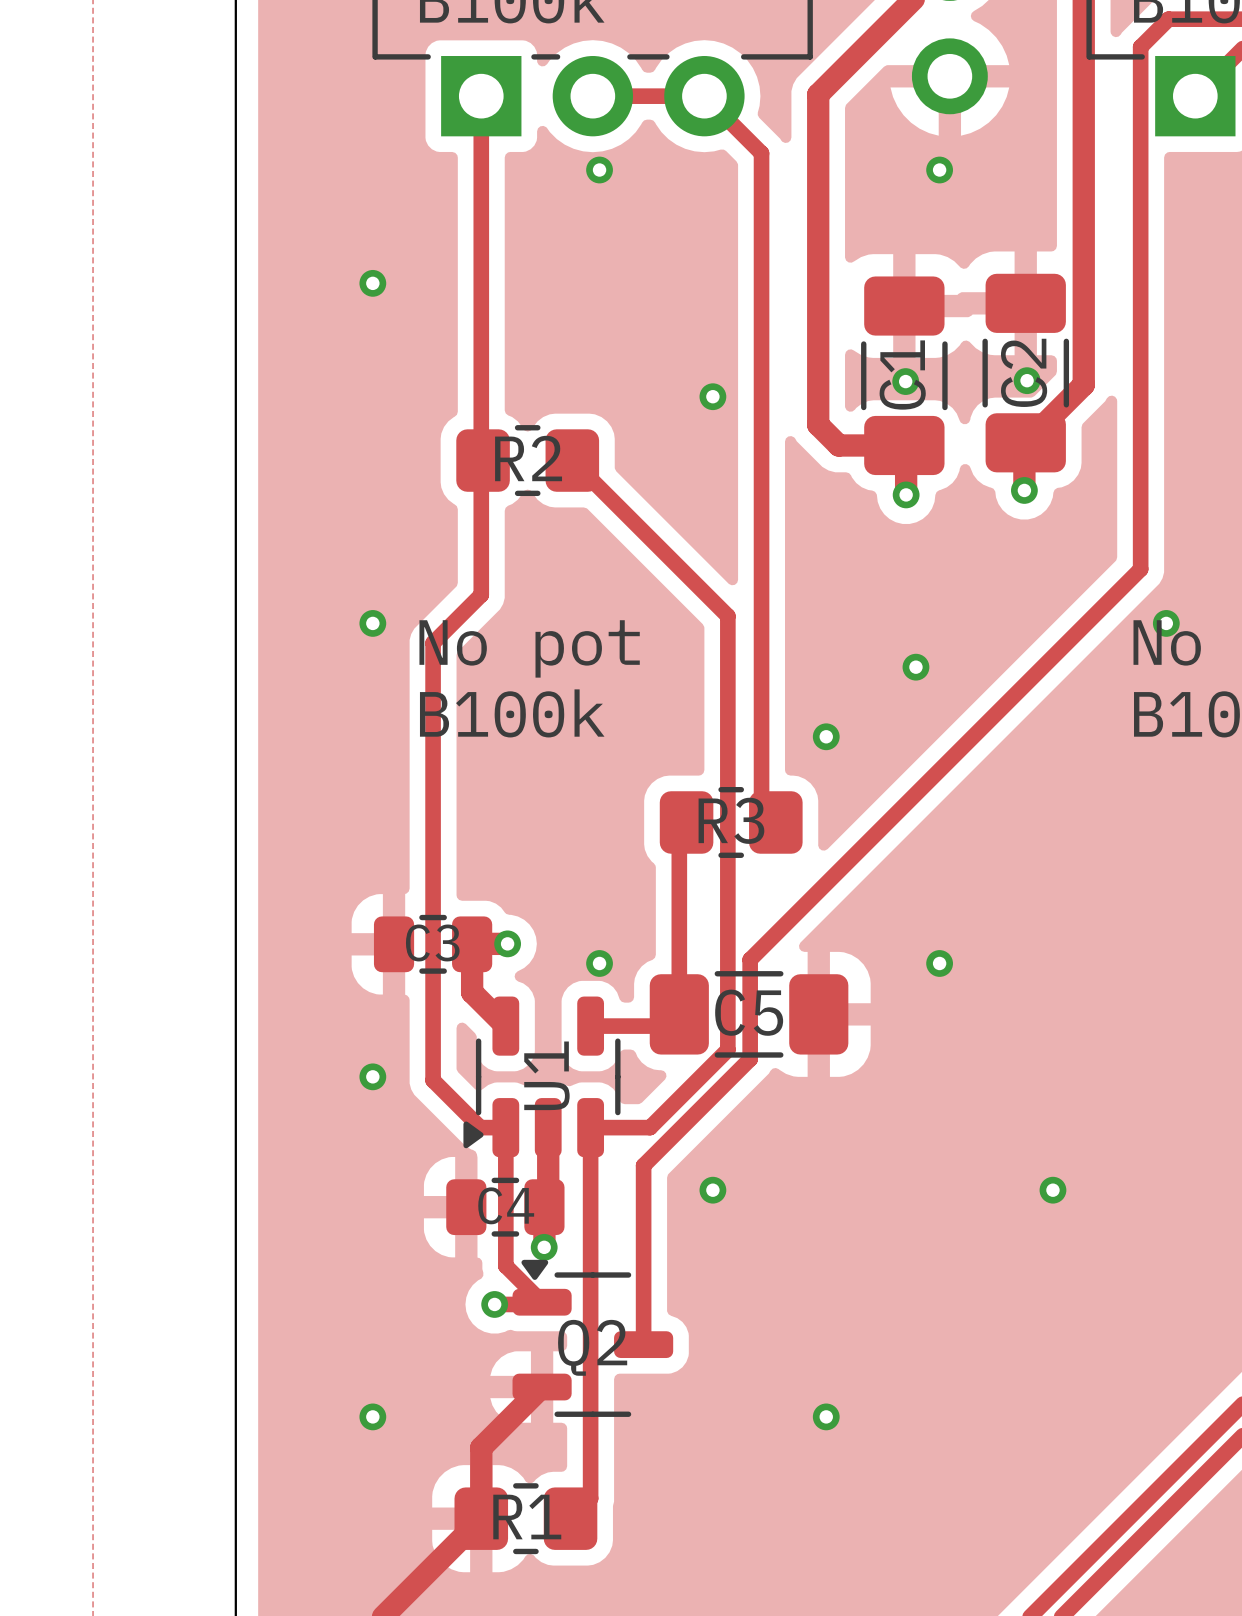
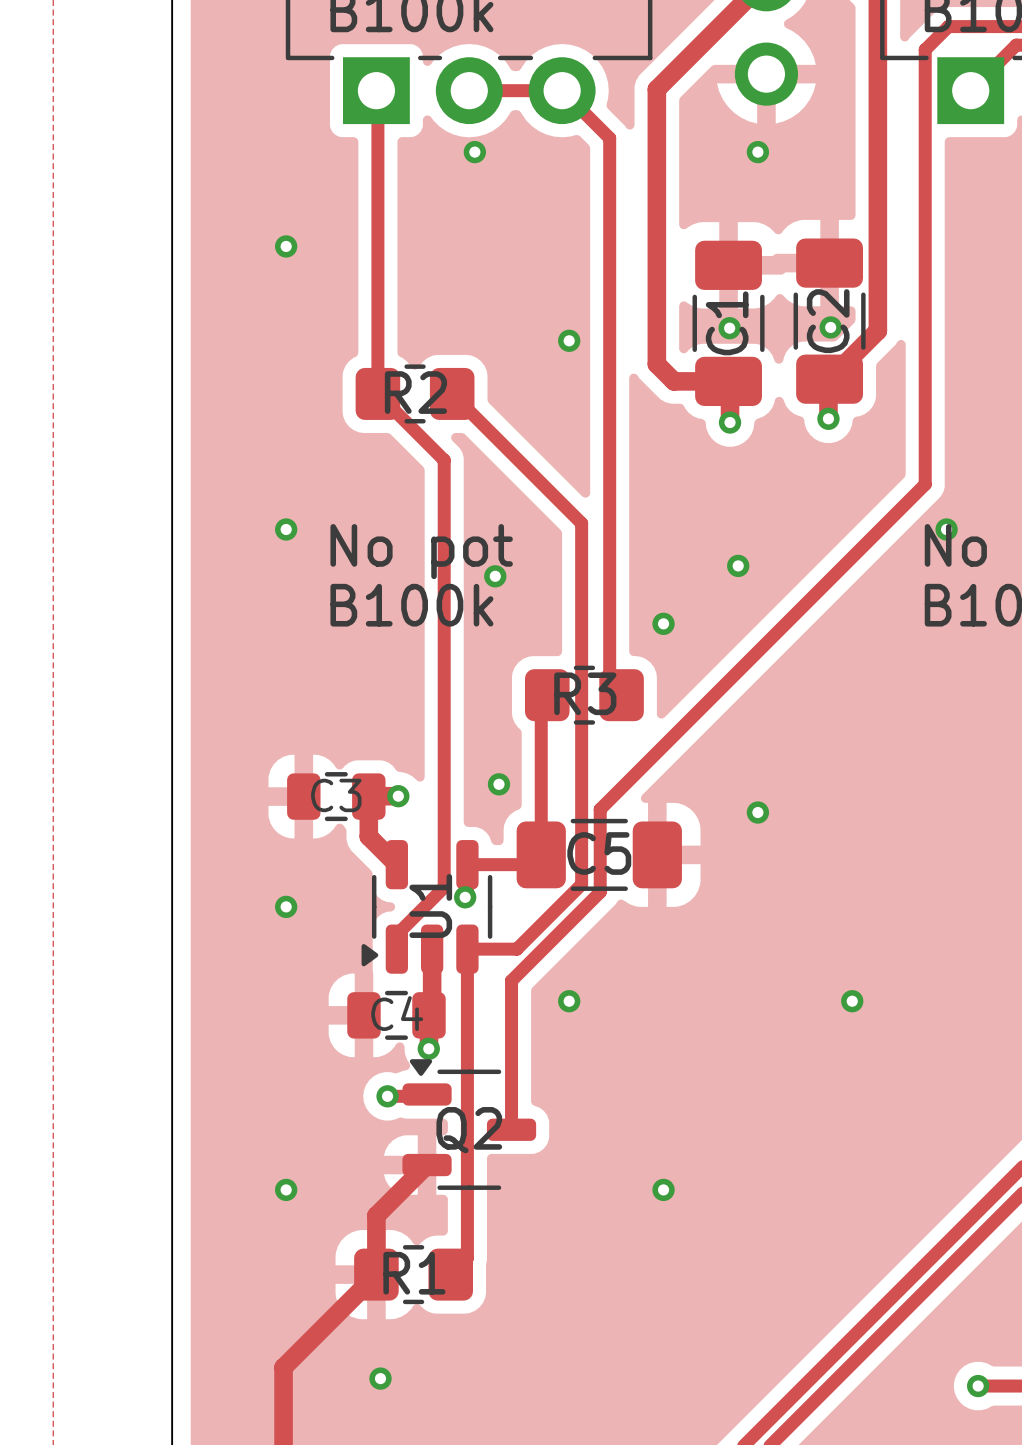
track: (481, 96) (481, 594) (433, 643) (433, 1080) (480, 1127) (505, 1127) (505, 1265) (542, 1302) -> (376, 90) (377, 393) (444, 460) (444, 887) (396, 934) (396, 949)
via: none -> (495, 576)
via position: (599, 963) -> (498, 784)
via: none -> (465, 897)

